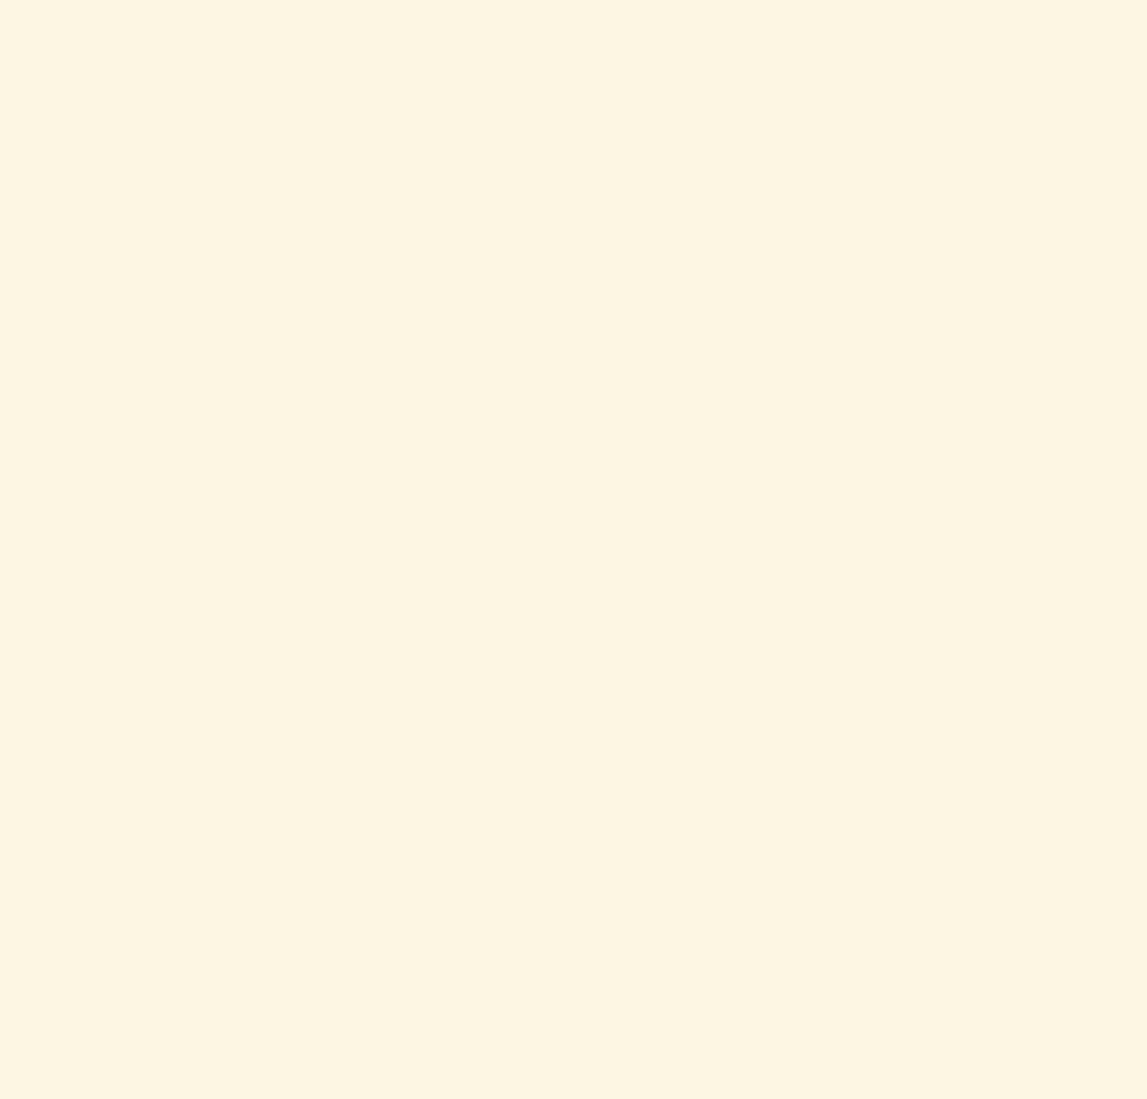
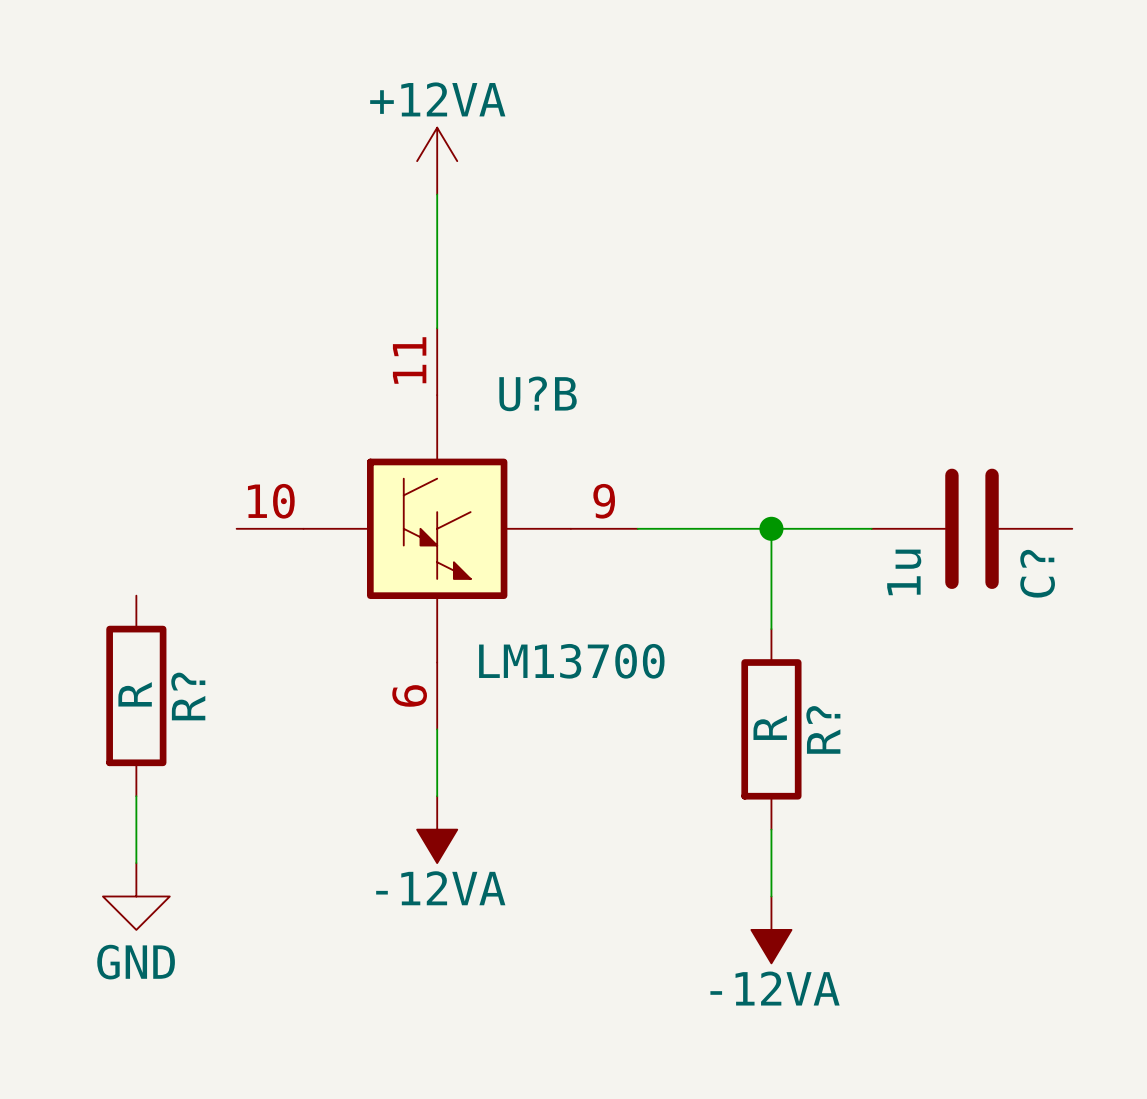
power symbol: none -> +12VA (437, 161)
wire: none -> (437, 194) (437, 328)
U?B: none -> LM13700 (437, 528)
wire: none -> (637, 528) (871, 528)
wire: none -> (771, 528) (771, 629)
junction: none -> (771, 528)
C?: none -> 1u (971, 528)
R?: none -> R (136, 695)
wire: none -> (437, 729) (437, 796)
R?: none -> R (771, 729)
wire: none -> (136, 796) (136, 863)
power symbol: none -> -12VA (437, 829)
wire: none -> (771, 829) (771, 896)
power symbol: none -> GND (136, 896)
power symbol: none -> -12VA (771, 929)

